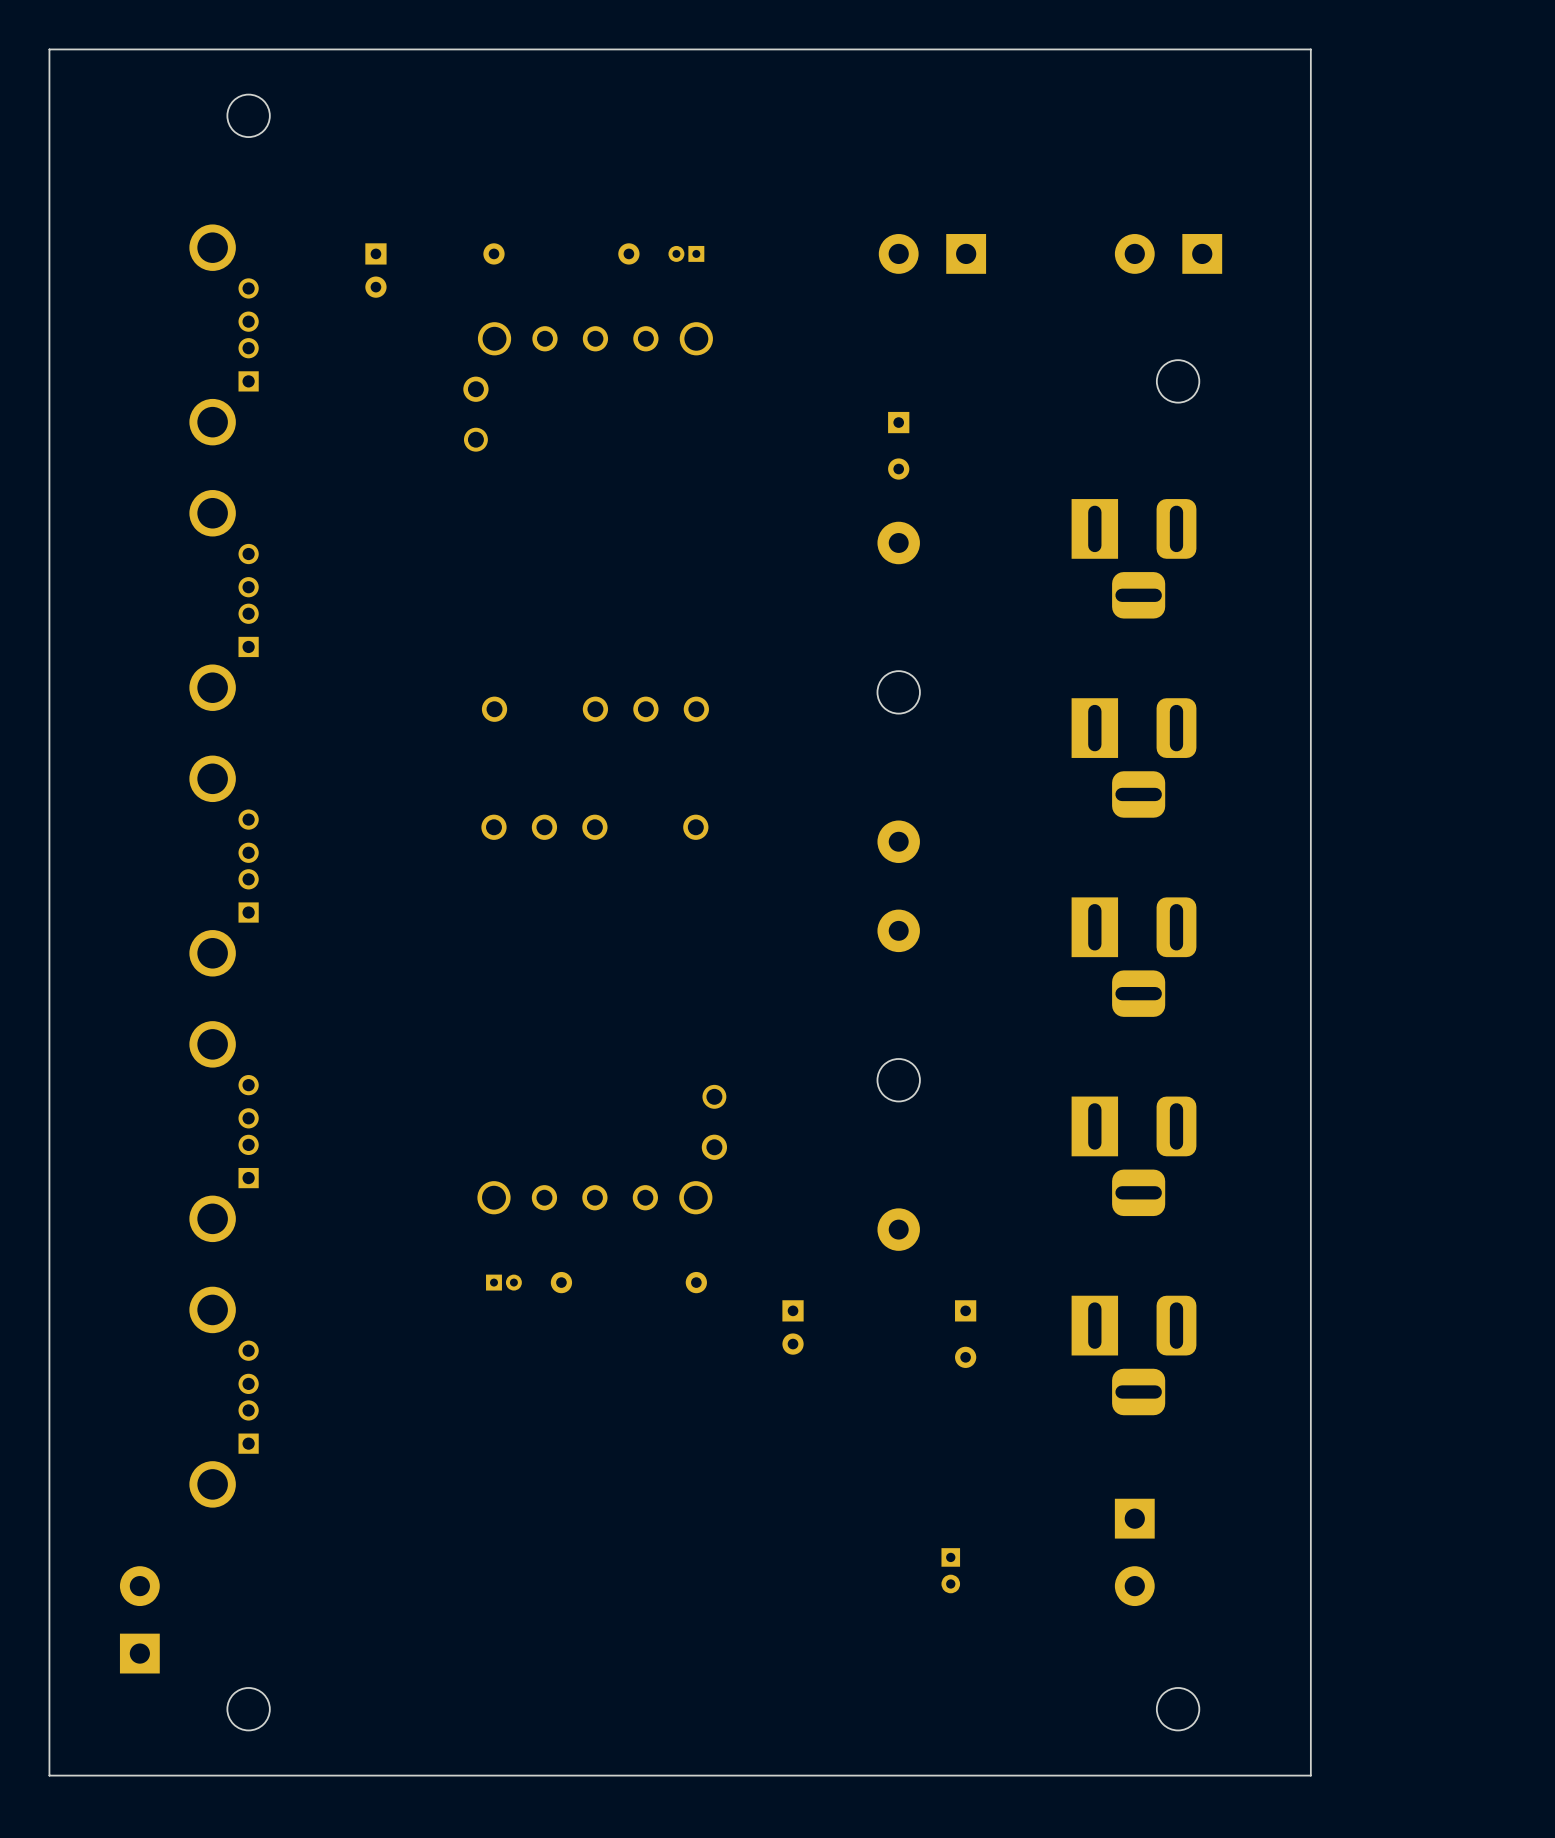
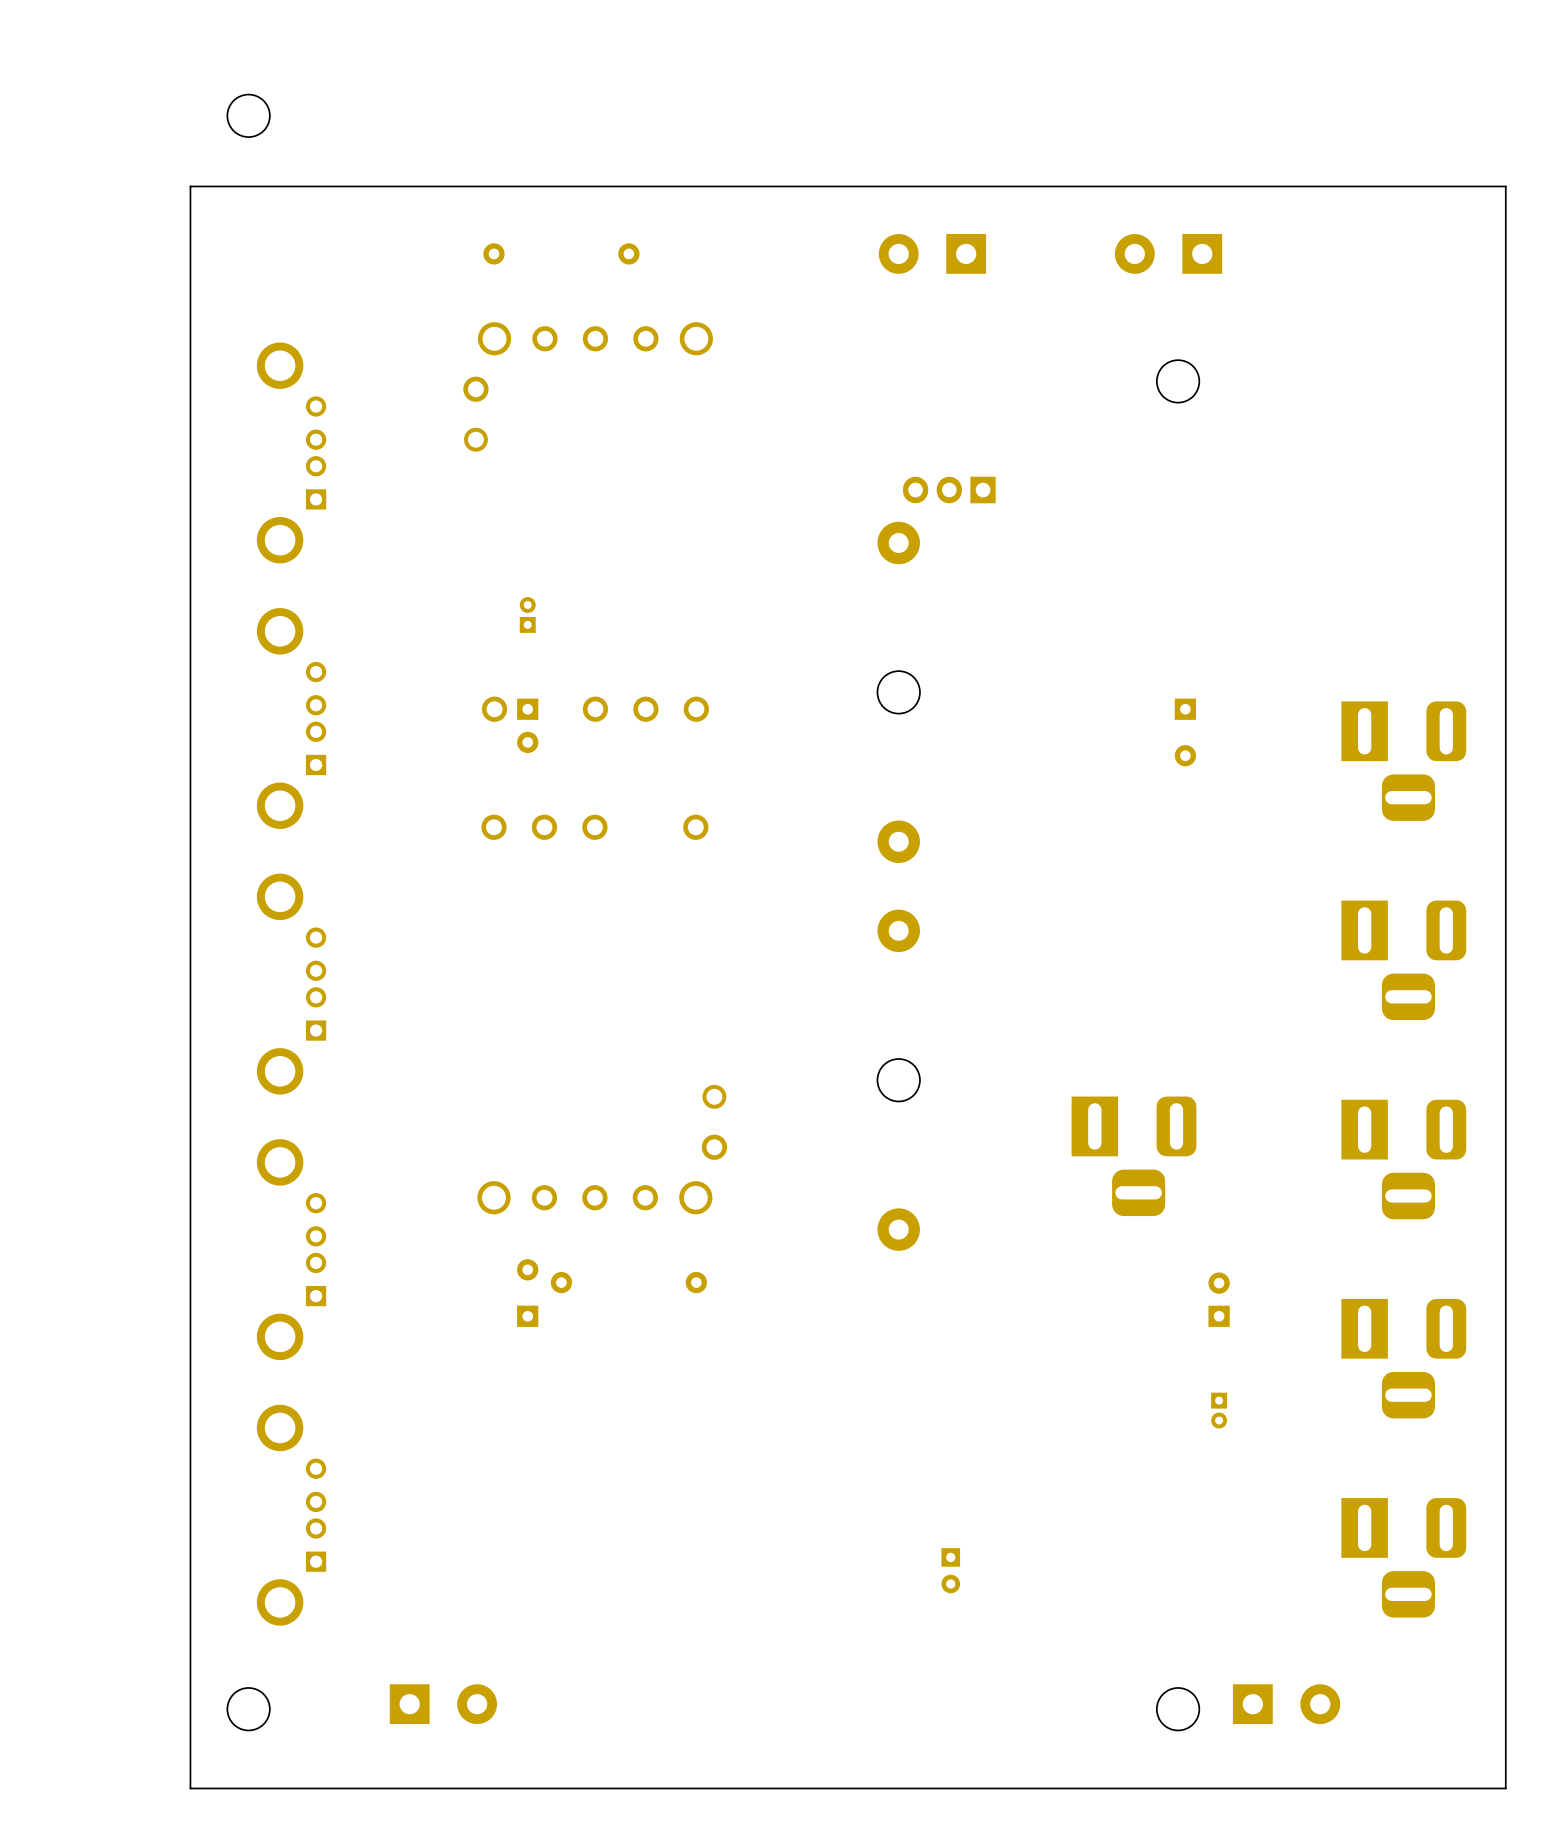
board edge: (1310, 49) (1310, 1775) (49, 1775) (49, 49) (1310, 49) -> (1505, 186) (1505, 1788) (190, 1788) (190, 186) (1505, 186)
part: (686, 253) -> none
part: (375, 270) -> none
part: (224, 334) -> none
part: (898, 445) -> none
part: none -> (291, 452)
part: none -> (949, 490)
part: (1134, 558) -> none
part: (224, 600) -> none
part: none -> (527, 614)
part: none -> (291, 718)
part: none -> (527, 725)
part: none -> (1185, 732)
part: (1134, 757) -> none
part: none -> (1403, 761)
part: (224, 866) -> none
part: (1134, 957) -> none
part: none -> (1403, 960)
part: none -> (291, 984)
part: (224, 1131) -> none
part: none -> (1403, 1159)
part: none -> (291, 1249)
part: (503, 1282) -> none
part: none -> (527, 1293)
part: none -> (1219, 1299)
part: (793, 1327) -> none
part: (965, 1334) -> none
part: (1134, 1355) -> none
part: none -> (1403, 1358)
part: (224, 1397) -> none
part: none -> (1219, 1410)
part: none -> (291, 1515)
part rotation: 0° (1134, 1552) -> 90° counterclockwise (1286, 1704)
part position: (1134, 1552) -> (1286, 1704)
part: none -> (1403, 1557)
part rotation: 0° (139, 1619) -> 90° clockwise (443, 1704)
part position: (139, 1619) -> (443, 1704)

